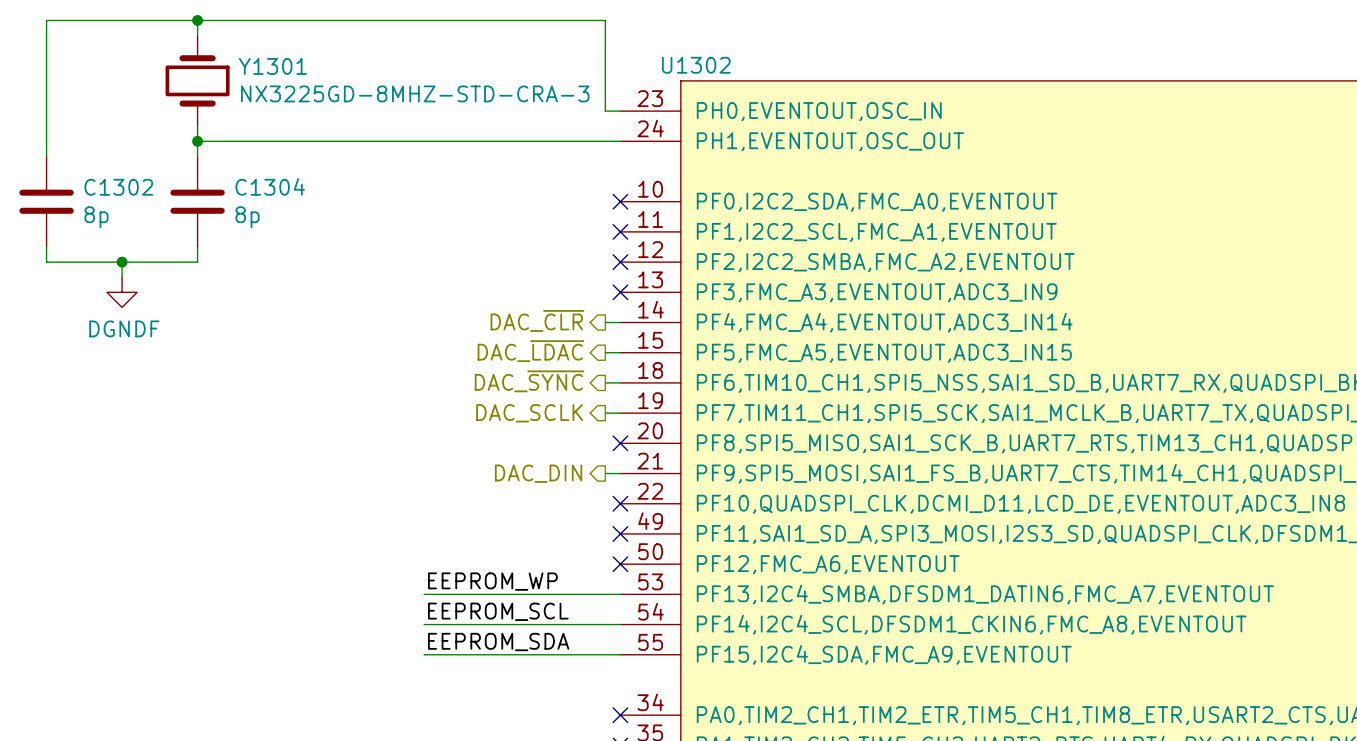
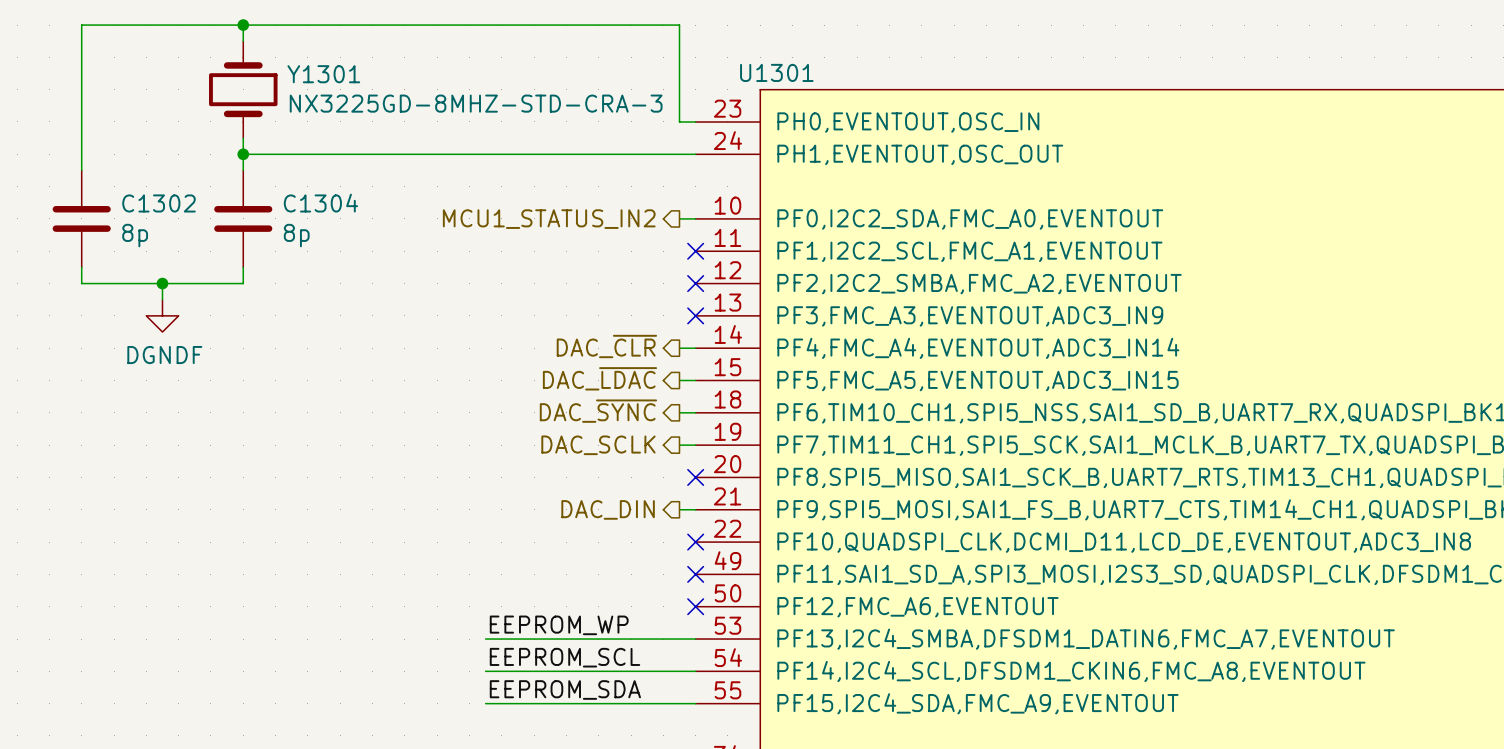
U1302 name: U1302 (696, 65) -> U1301 (776, 72)
hierarchical label: none -> MCU1_STATUS_IN2 (549, 219)
wire: none -> (679, 218) (695, 218)
no-connect mark: (620, 201) -> none

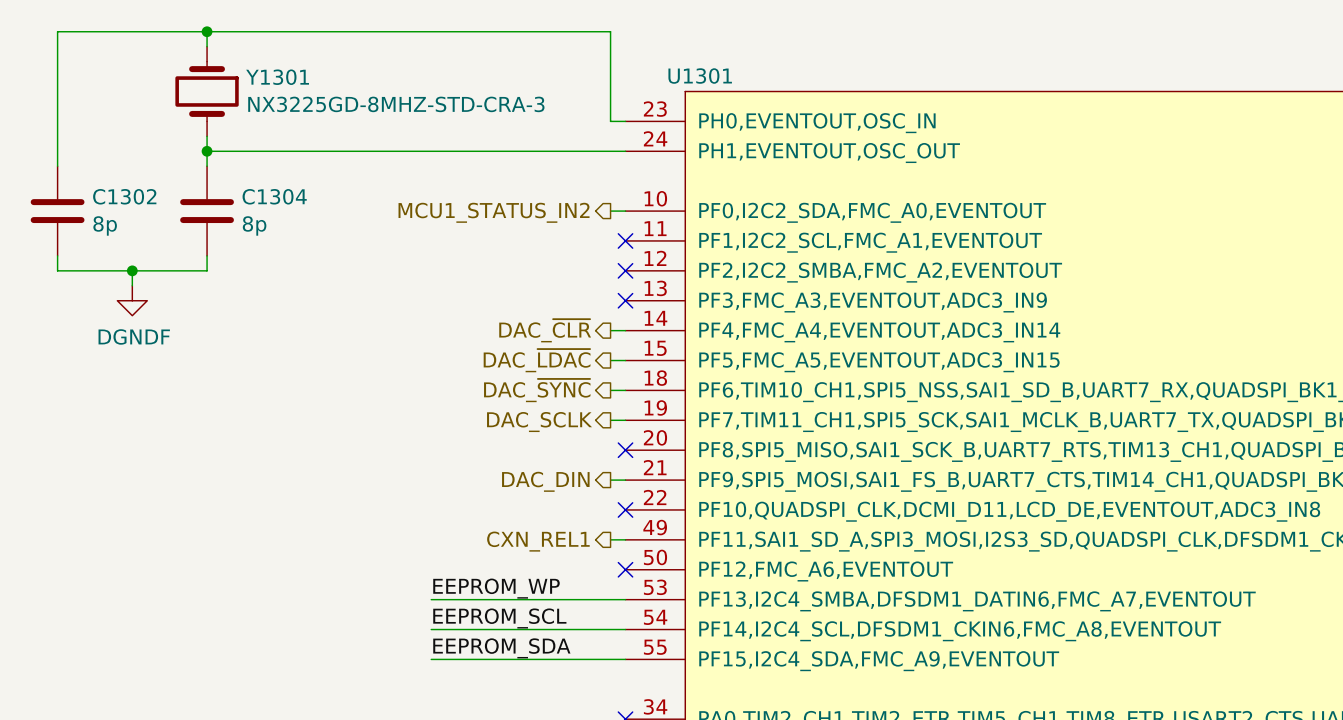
hierarchical label: none -> CXN_REL1 (538, 541)
wire: none -> (610, 539) (625, 539)
no-connect mark: (695, 574) -> none

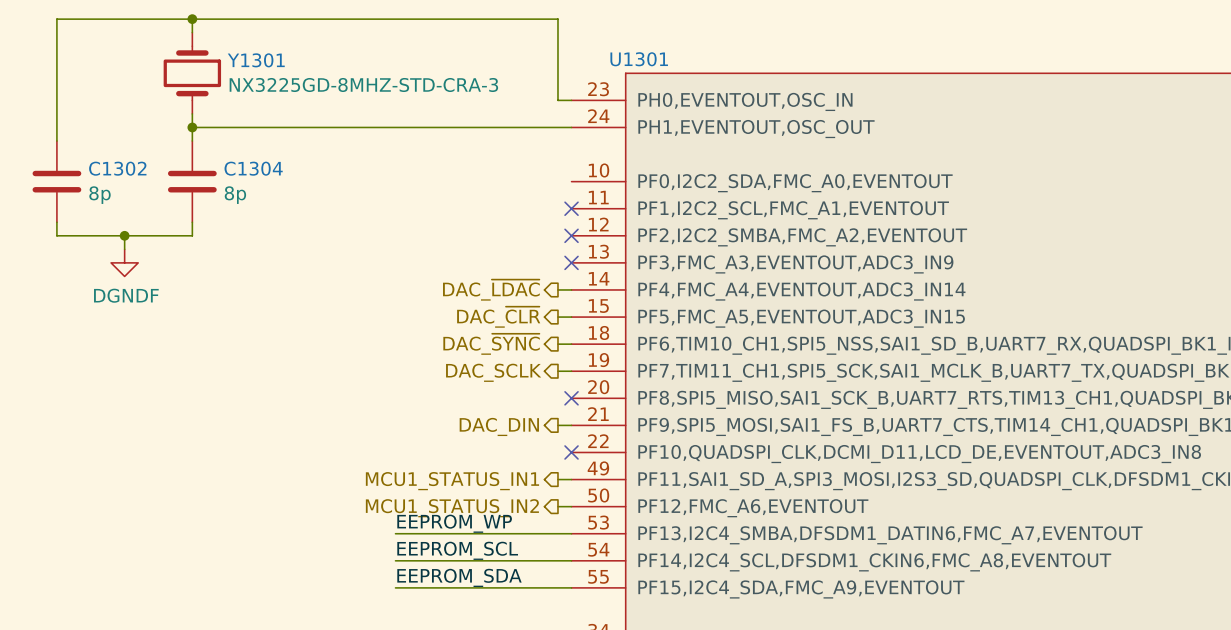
wire: (610, 211) (625, 211) -> none
hierarchical label: MCU1_STATUS_IN2 (494, 212) -> none
hierarchical label: DAC_~{CLR} (545, 330) -> DAC_~{LDAC} (491, 290)
hierarchical label: DAC_~{LDAC} (537, 360) -> DAC_~{CLR} (498, 317)
hierarchical label: CXN_REL1 (538, 541) -> MCU1_STATUS_IN1 (452, 481)
wire: none -> (557, 506) (571, 506)
no-connect mark: (625, 569) -> none
hierarchical label: none -> MCU1_STATUS_IN2 (452, 508)

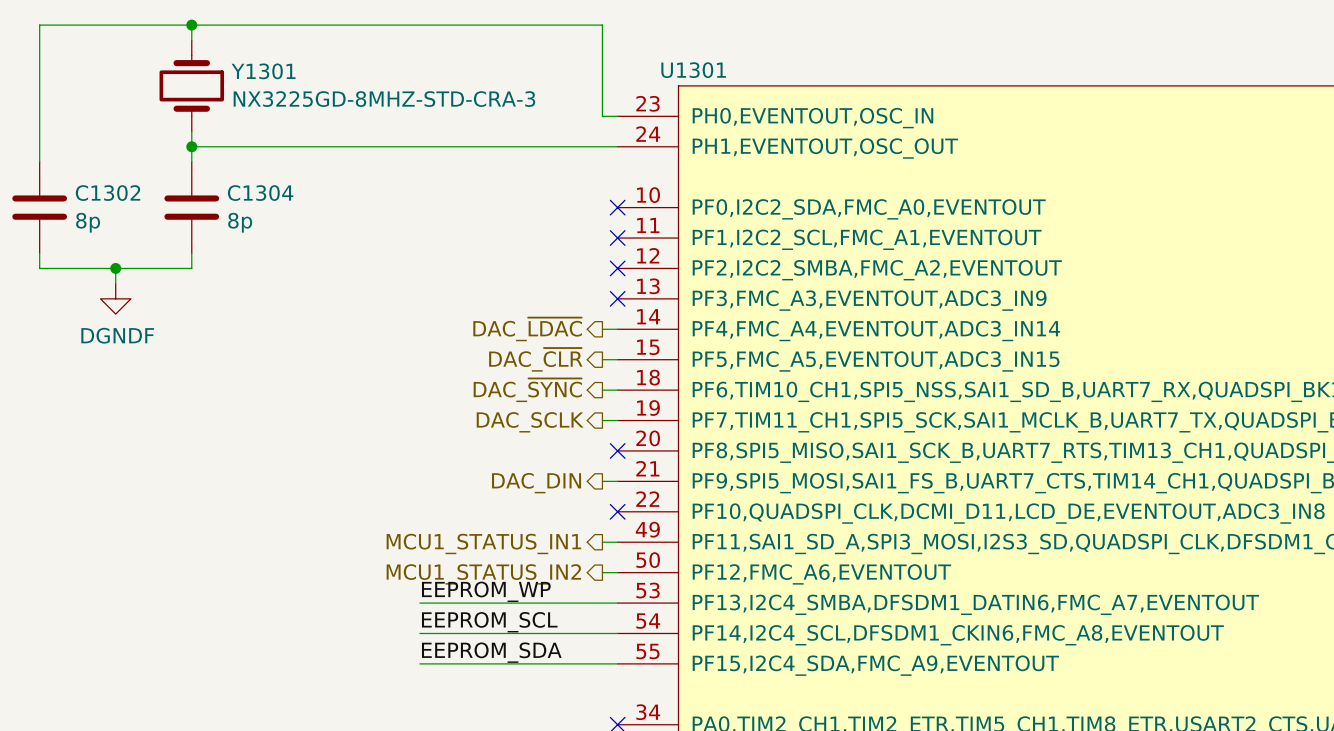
no-connect mark: none -> (617, 207)

